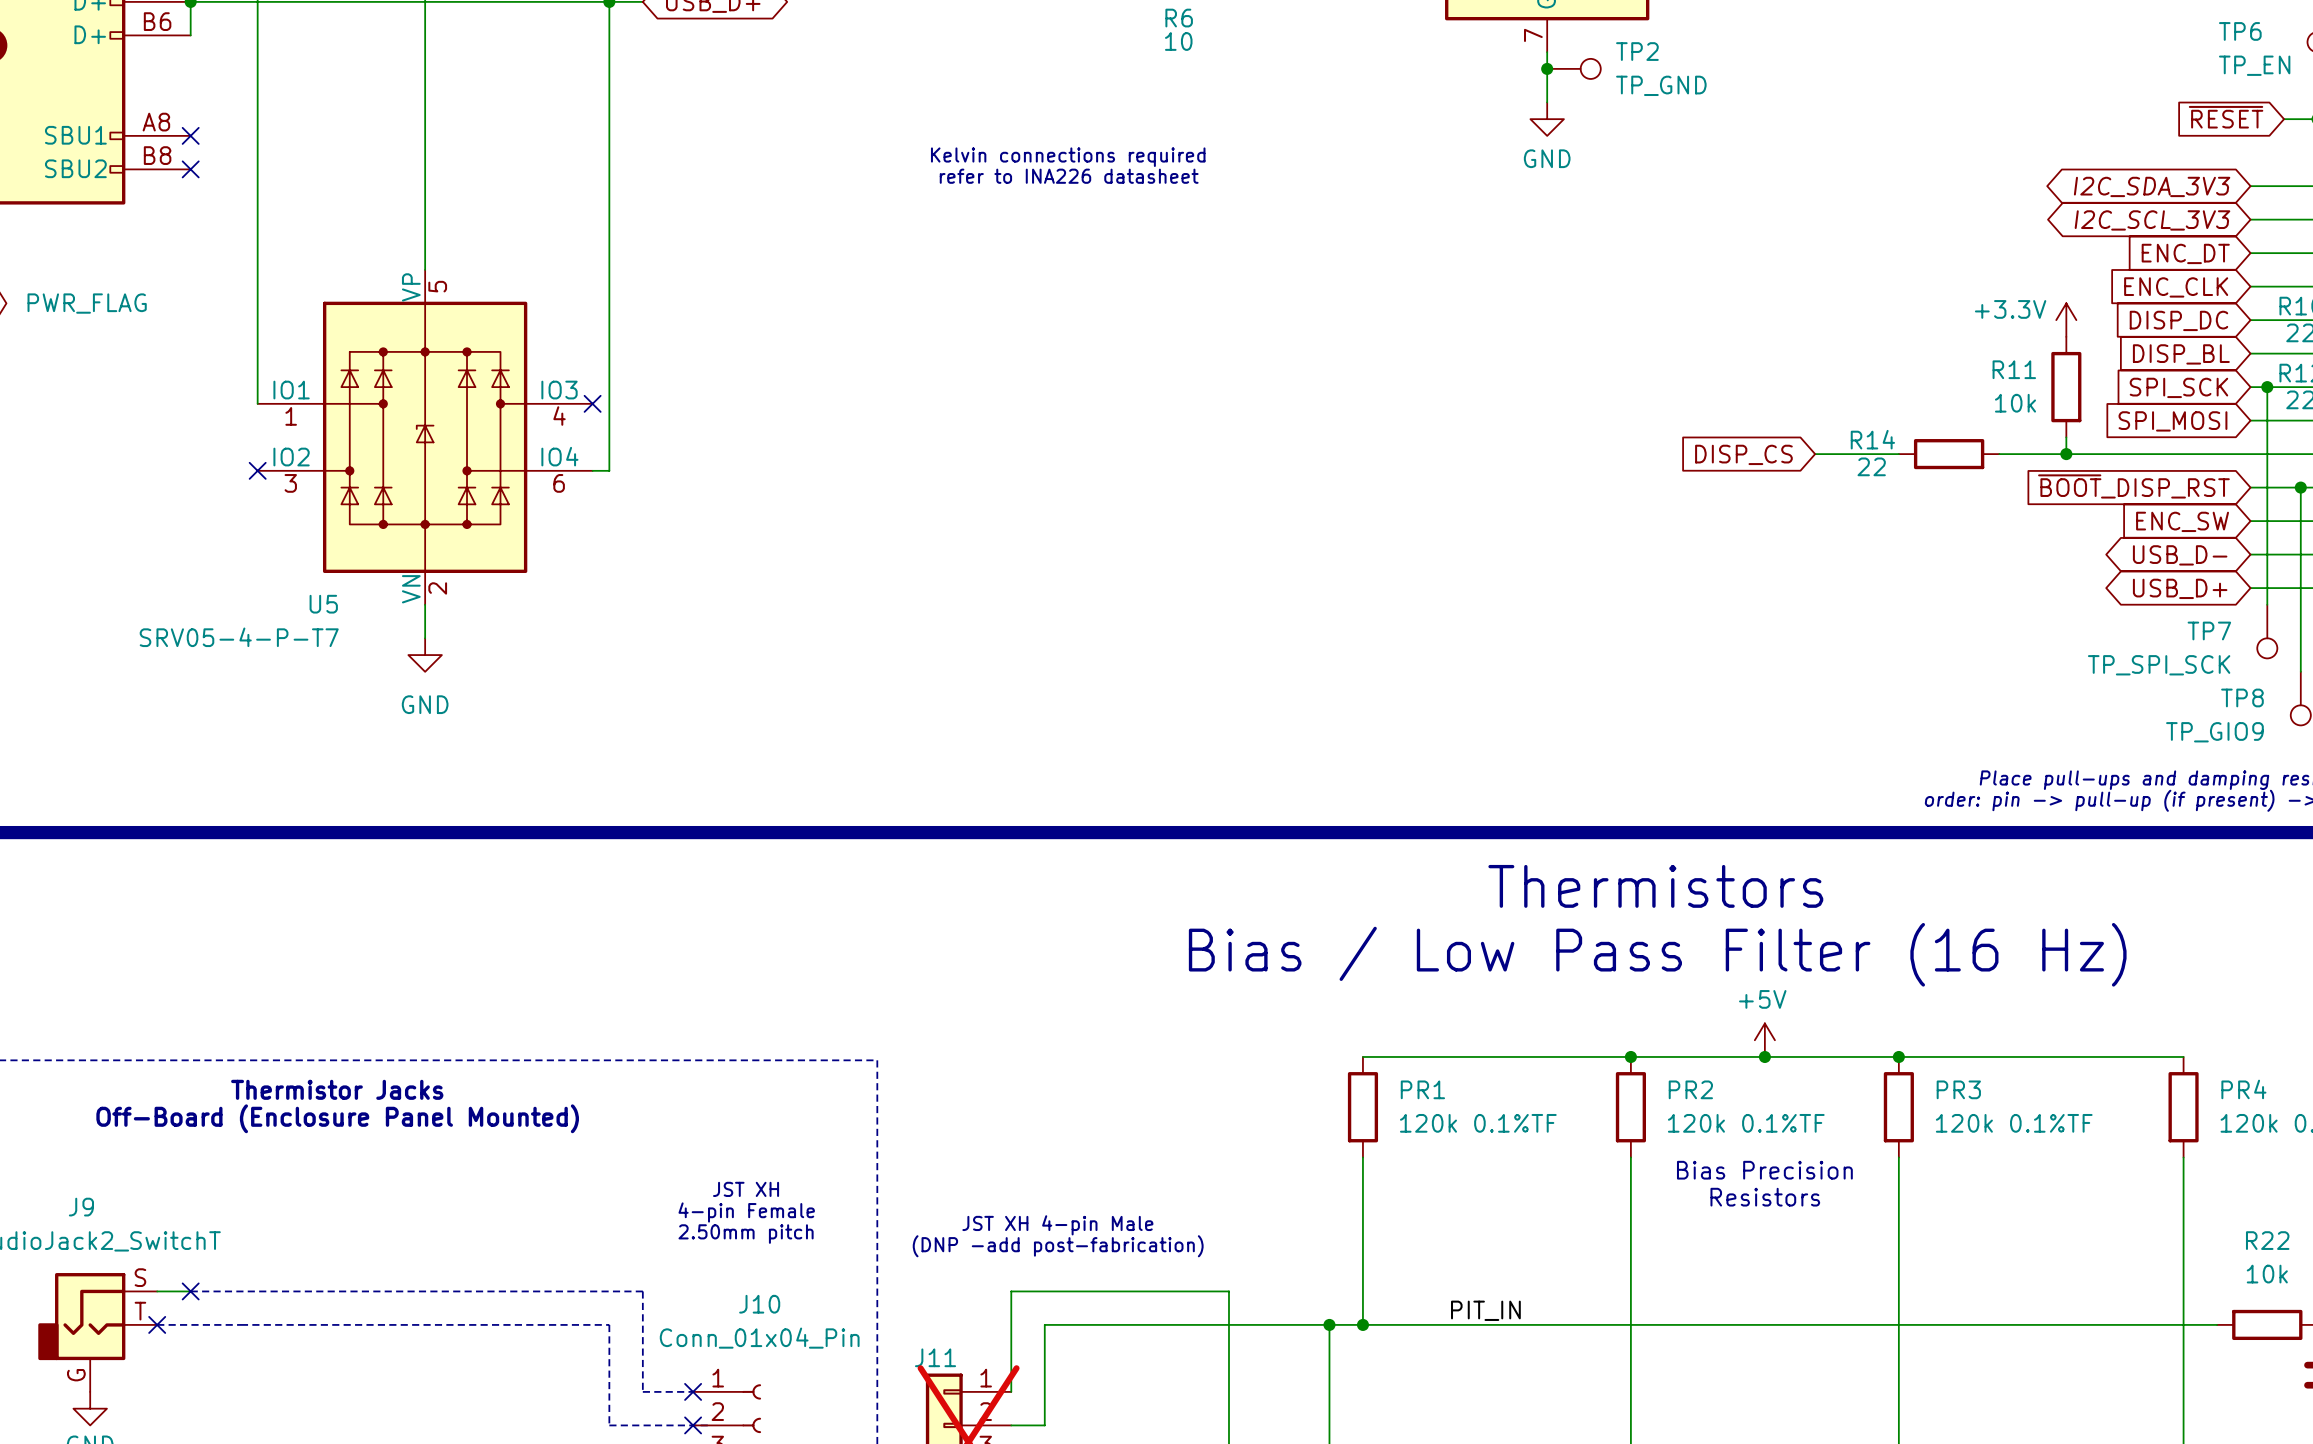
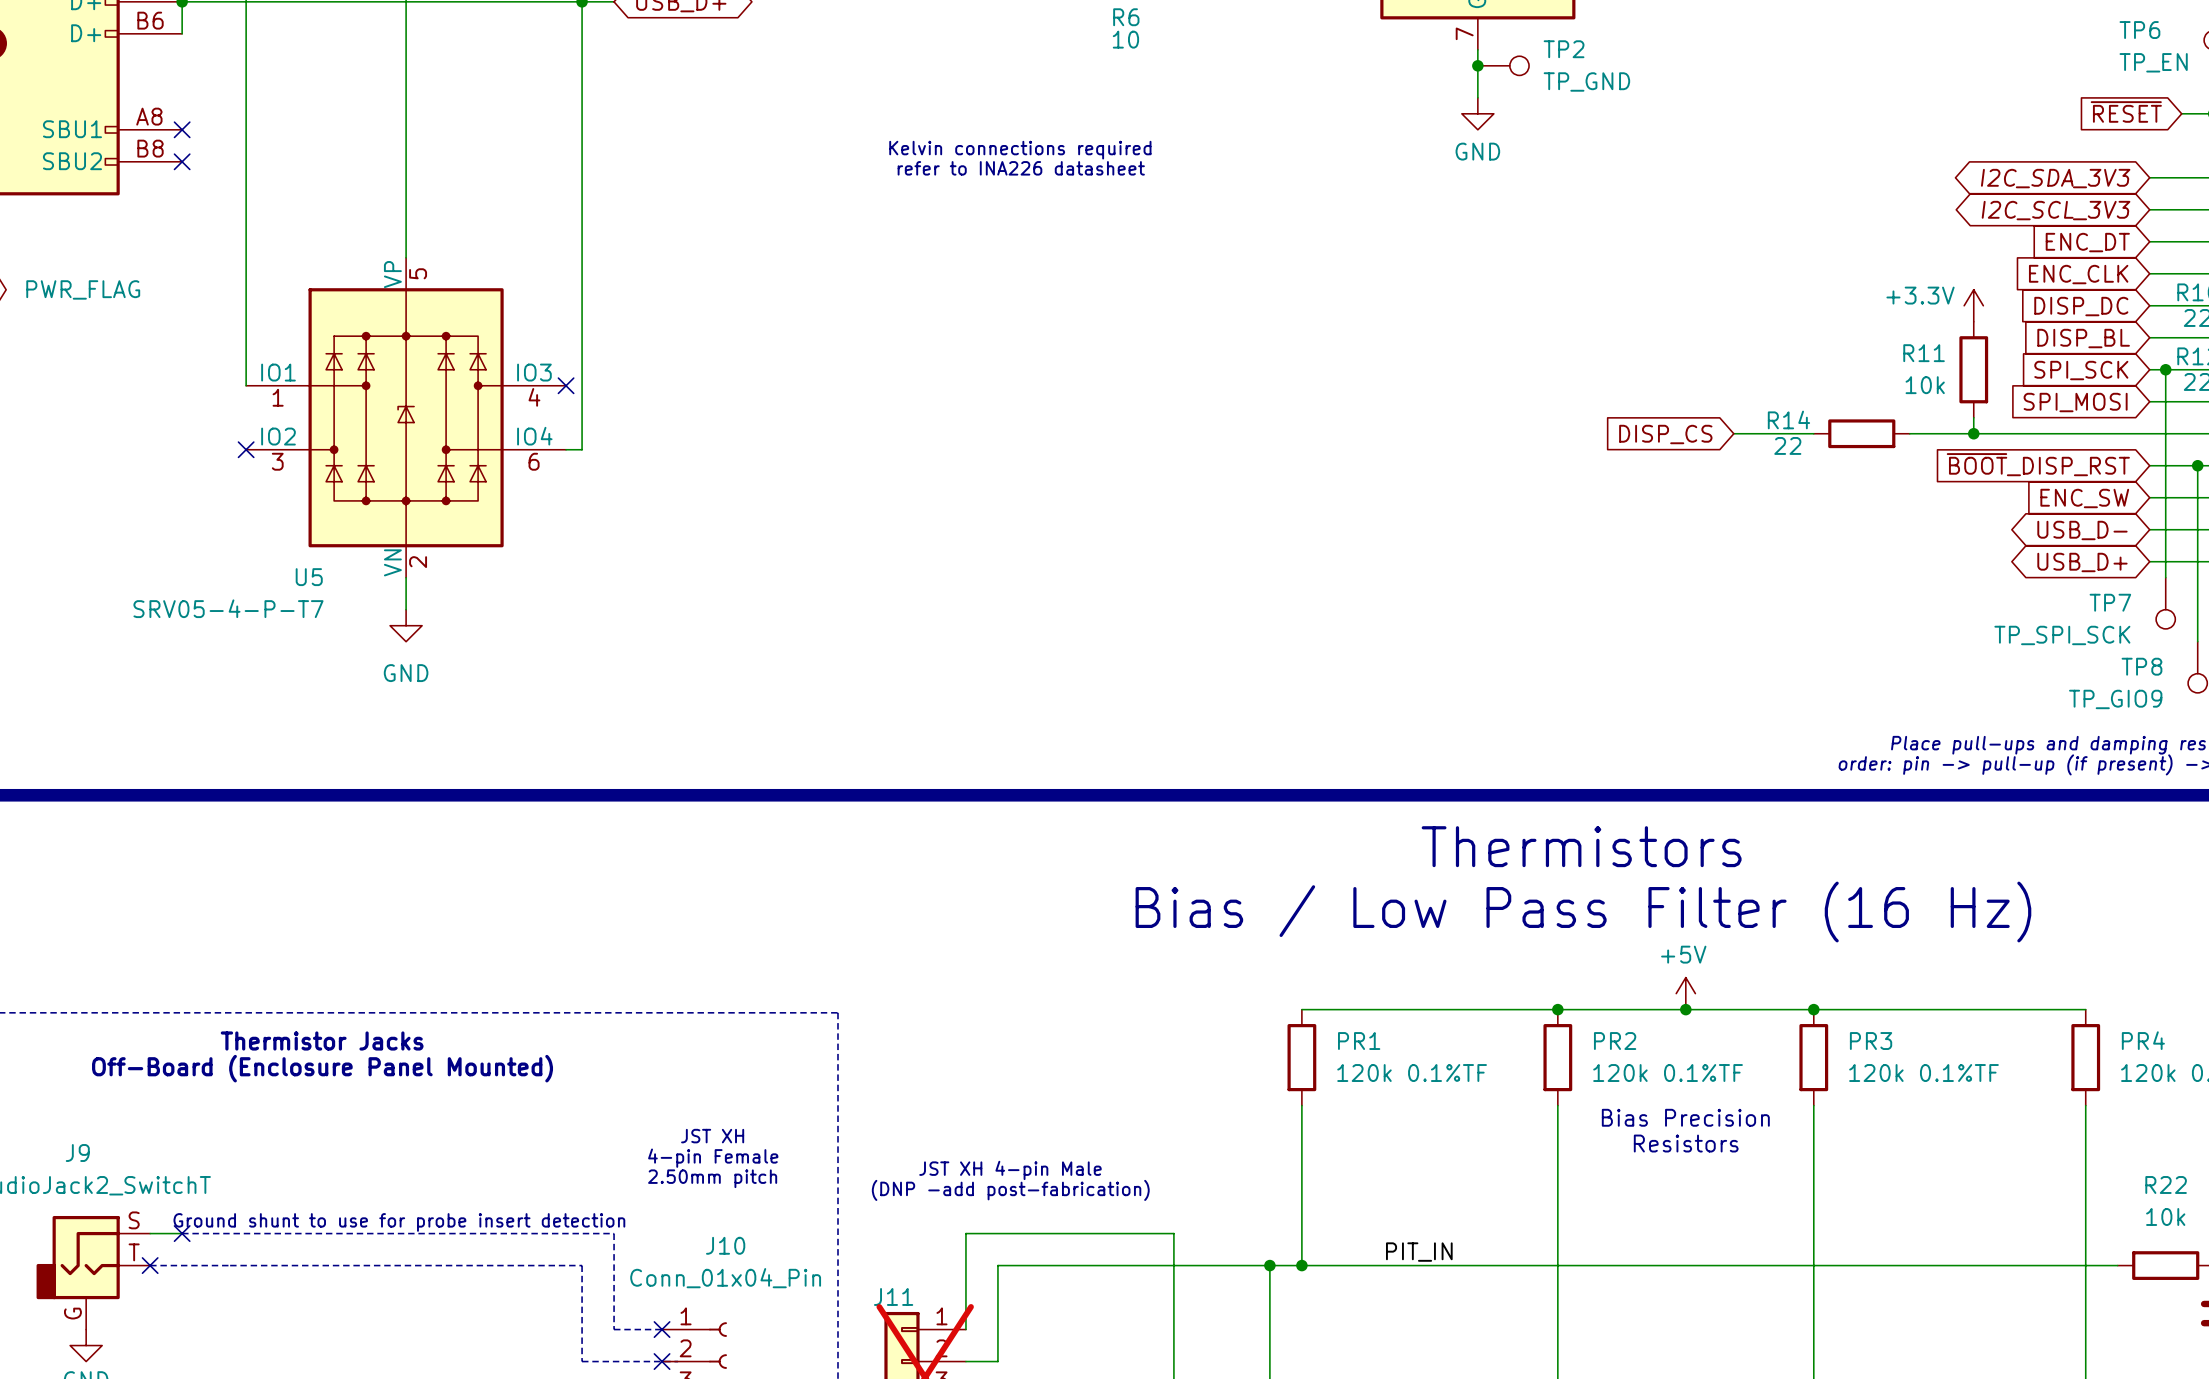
text: none -> Ground shunt to use for probe insert detection (399, 1222)

